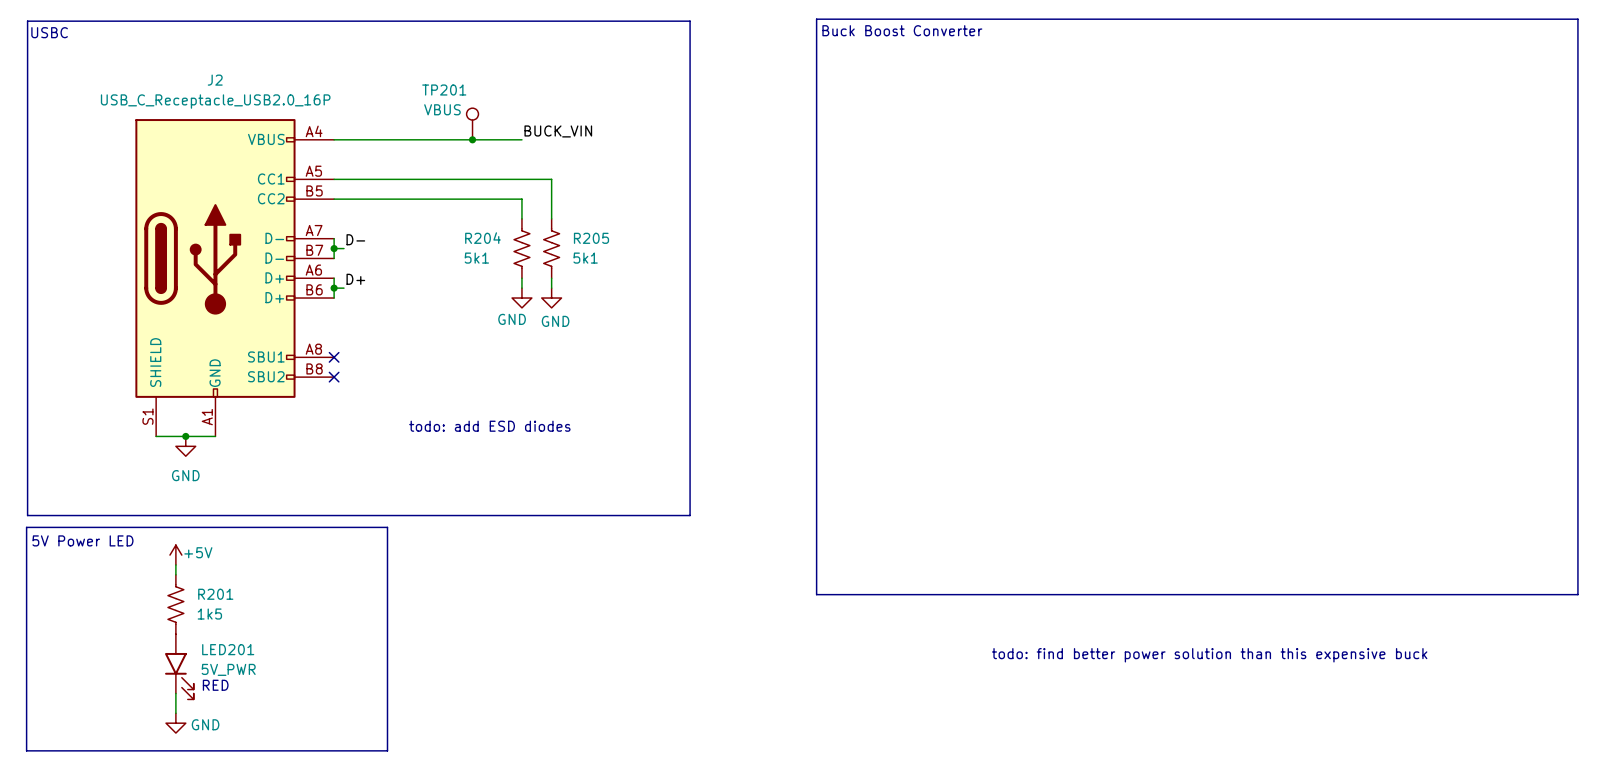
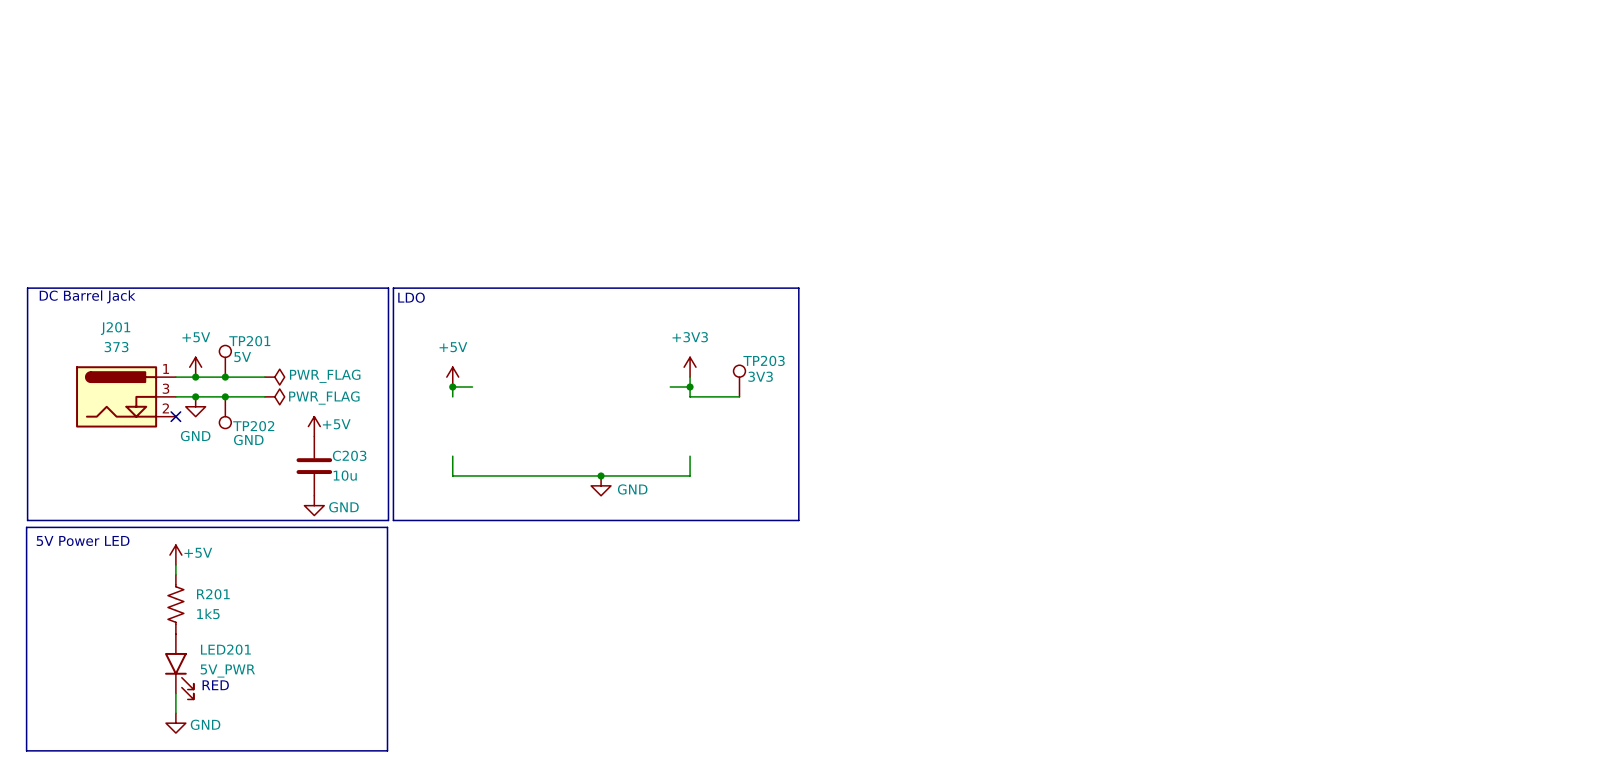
line: (816, 19) (1577, 19) (1577, 594) (816, 594) (816, 19) -> none
text: Buck Boost Converter (902, 30) -> none
text: USBC (49, 32) -> none
TP201 name position: TP201 (444, 90) -> TP201 (249, 341)
TP201 value: VBUS (442, 109) -> 5V (242, 357)
TP201 position: (472, 123) -> (225, 361)
label: BUCK_VIN (558, 131) -> none
wire: (334, 139) (521, 139) -> none
junction: (472, 139) -> none
wire: (334, 179) (551, 179) (551, 218) -> none
wire: (334, 199) (521, 199) (521, 218) -> none
wire: (334, 238) (334, 258) -> none
label: D- (355, 239) -> none
wire: (334, 248) (343, 248) -> none
junction: (334, 248) -> none
R204: 5k1 (521, 248) -> none
R205: 5k1 (551, 248) -> none
J2: USB_C_Receptacle_USB2.0_16P (234, 277) -> none
wire: (334, 278) (334, 298) -> none
wire: (521, 278) (521, 288) -> none
wire: (551, 278) (551, 288) -> none
label: D+ (355, 279) -> none
line: (27, 288) (27, 21) (690, 21) (690, 515) (27, 515) -> (27, 288) (388, 288) (388, 520) (27, 520) (27, 515)
junction: (334, 288) -> none
line: none -> (393, 288) (798, 288) (798, 520) (393, 520) (393, 288)
text: none -> DC Barrel Jack (87, 296)
text: none -> LDO (411, 297)
power symbol: GND (521, 298) -> none
power symbol: GND (551, 298) -> none
no-connect mark: (334, 357) -> none
power symbol: none -> +5V (195, 367)
power symbol: none -> +3V3 (690, 367)
junction: none -> (195, 377)
junction: none -> (225, 377)
power symbol: none -> PWR_FLAG (274, 377)
no-connect mark: (334, 377) -> none
power symbol: none -> +5V (452, 377)
wire: none -> (690, 377) (690, 396) (739, 396)
TP203: none -> 3V3 (739, 381)
junction: none -> (452, 387)
wire: none -> (472, 387) (452, 387) (452, 396)
wire: none -> (670, 387) (690, 387)
junction: none -> (690, 387)
J201: none -> 373 (125, 396)
junction: none -> (195, 396)
junction: none -> (225, 396)
power symbol: none -> PWR_FLAG (274, 396)
TP202: none -> GND (225, 412)
no-connect mark: none -> (175, 416)
power symbol: none -> +5V (314, 426)
text: todo: add ESD diodes (489, 426) -> none
wire: (156, 436) (215, 436) -> none
junction: (185, 436) -> none
power symbol position: GND (185, 446) -> GND (195, 406)
wire: none -> (452, 456) (452, 475) (690, 475) (690, 456)
C203: none -> 10u (314, 466)
junction: none -> (601, 475)
power symbol: none -> GND (601, 485)
power symbol: none -> GND (314, 505)
text: todo: find better power solution than this expensive buck (1209, 655) -> none

